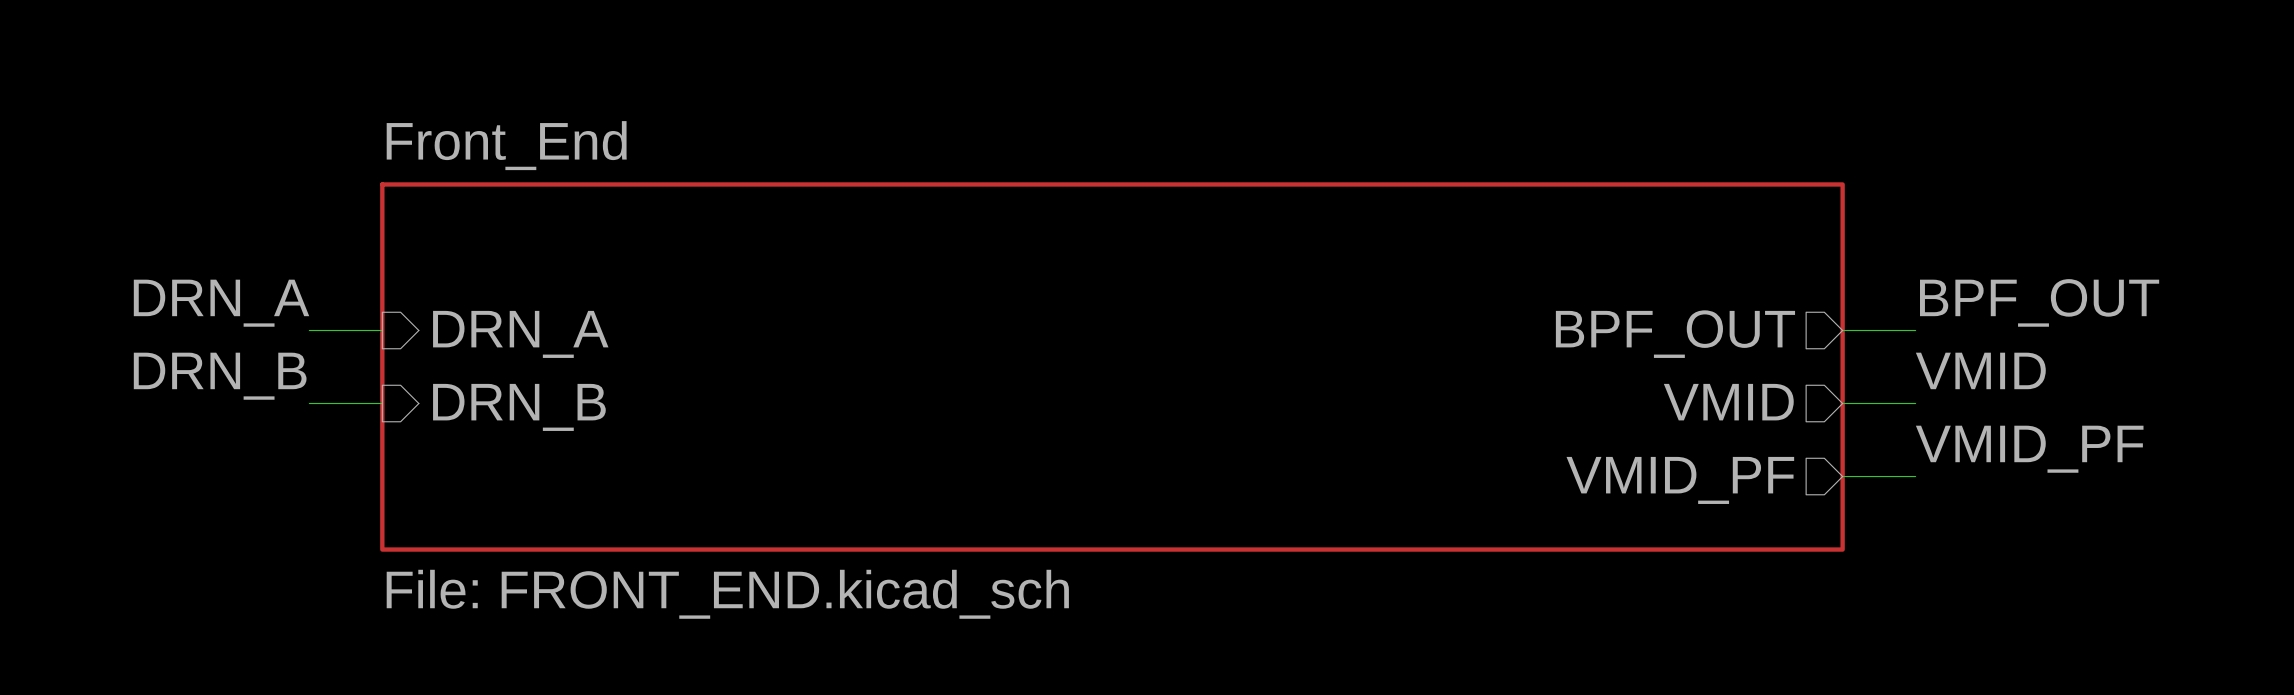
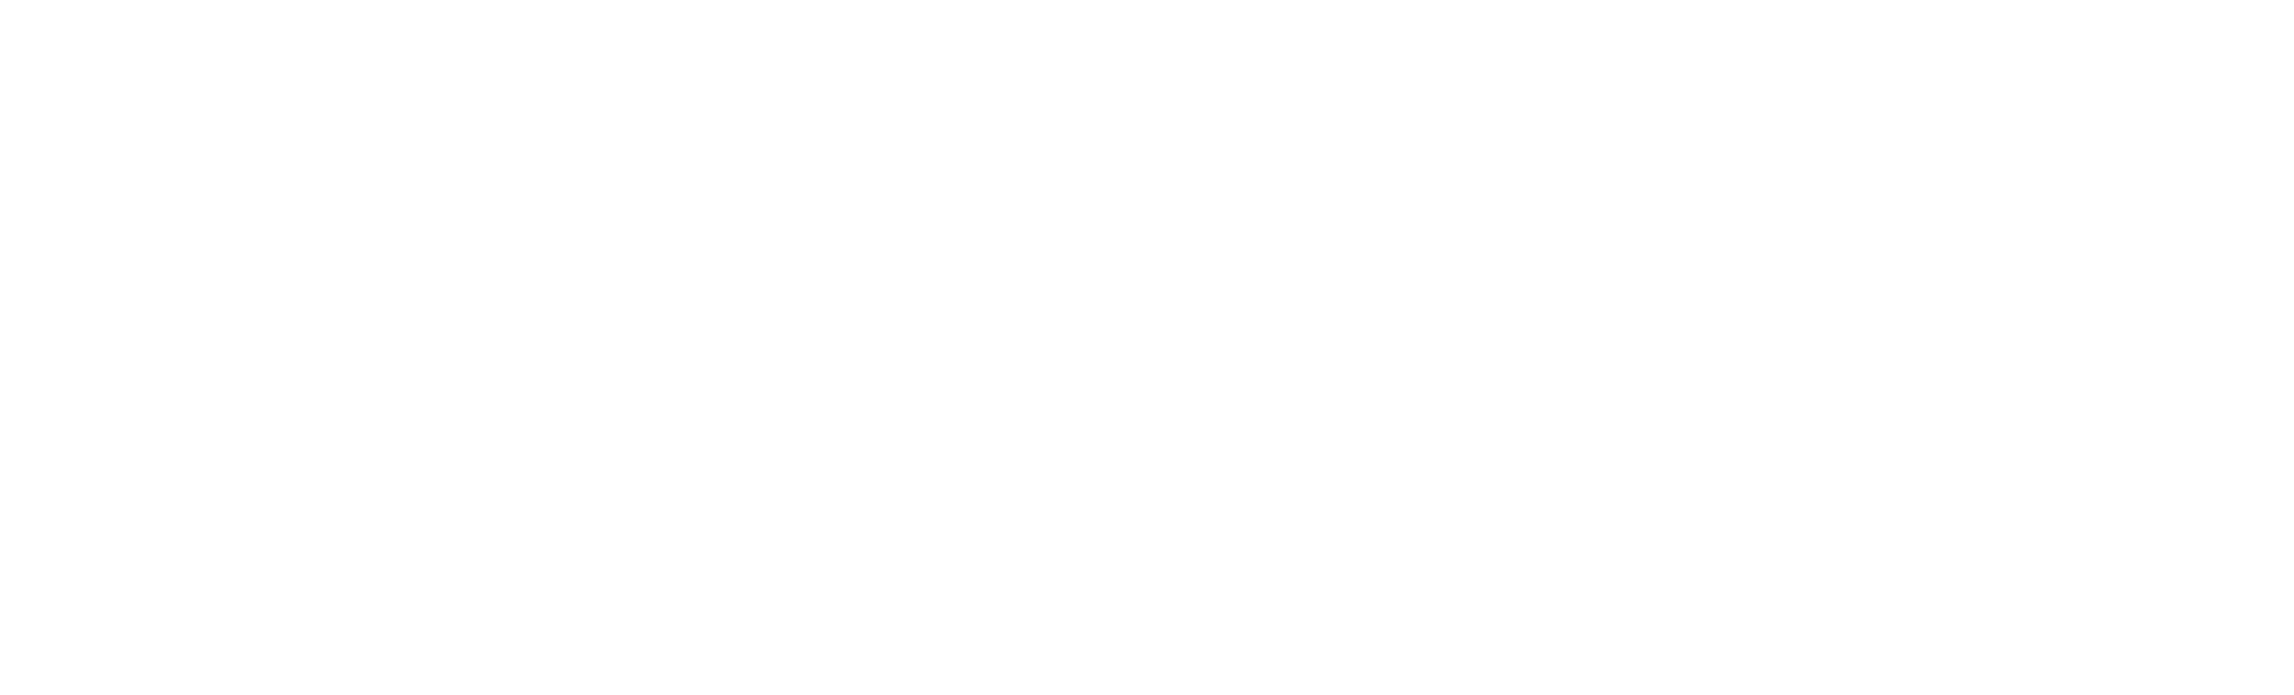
label: BPF_OUT (2039, 302) -> none
label: DRN_A (221, 303) -> none
wire: (309, 330) (382, 330) -> none
wire: (1842, 330) (1915, 330) -> none
sheet pin: DRN_A (520, 334) -> none
sheet pin: BPF_OUT (1675, 334) -> none
sheet Front_End: File: FRONT_END.kicad_sch (1112, 367) -> none
label: VMID (1980, 370) -> none
label: DRN_B (220, 376) -> none
sheet pin: VMID (1728, 402) -> none
wire: (309, 403) (382, 403) -> none
wire: (1842, 403) (1915, 403) -> none
sheet pin: DRN_B (519, 407) -> none
label: VMID_PF (2029, 449) -> none
wire: (1842, 476) (1915, 476) -> none
sheet pin: VMID_PF (1680, 480) -> none

